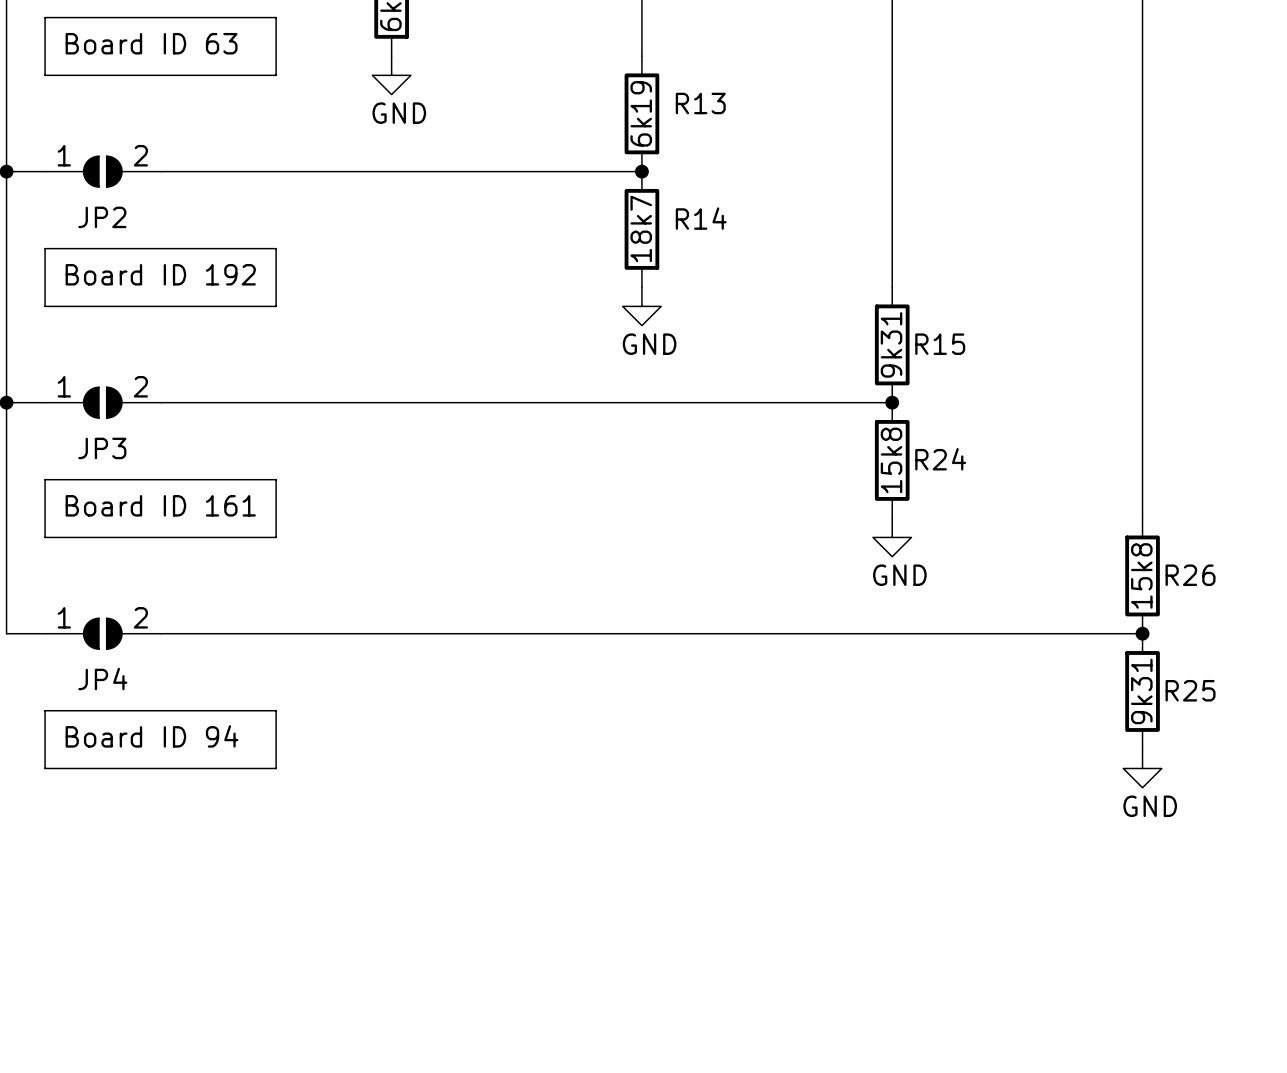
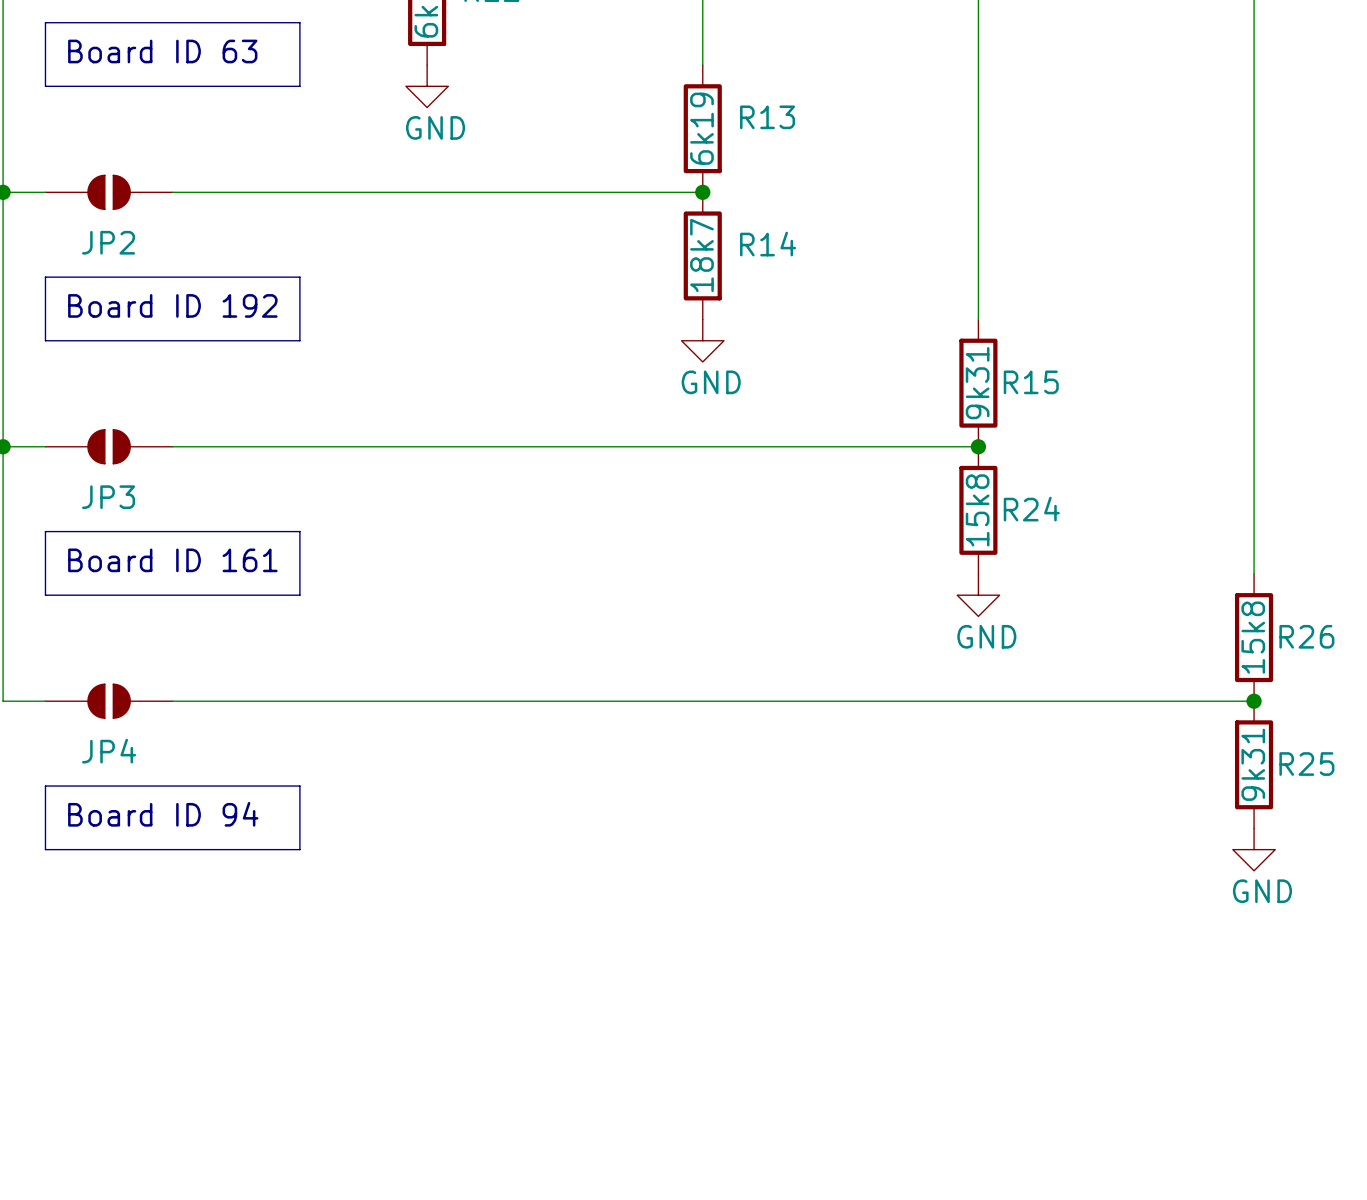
JP2 pin number: 1 (64, 155) -> none
JP2 pin number: 2 (140, 155) -> none
JP3 pin number: 1 (64, 386) -> none
JP3 pin number: 2 (140, 386) -> none
JP4 pin number: 1 (64, 617) -> none
JP4 pin number: 2 (140, 617) -> none

